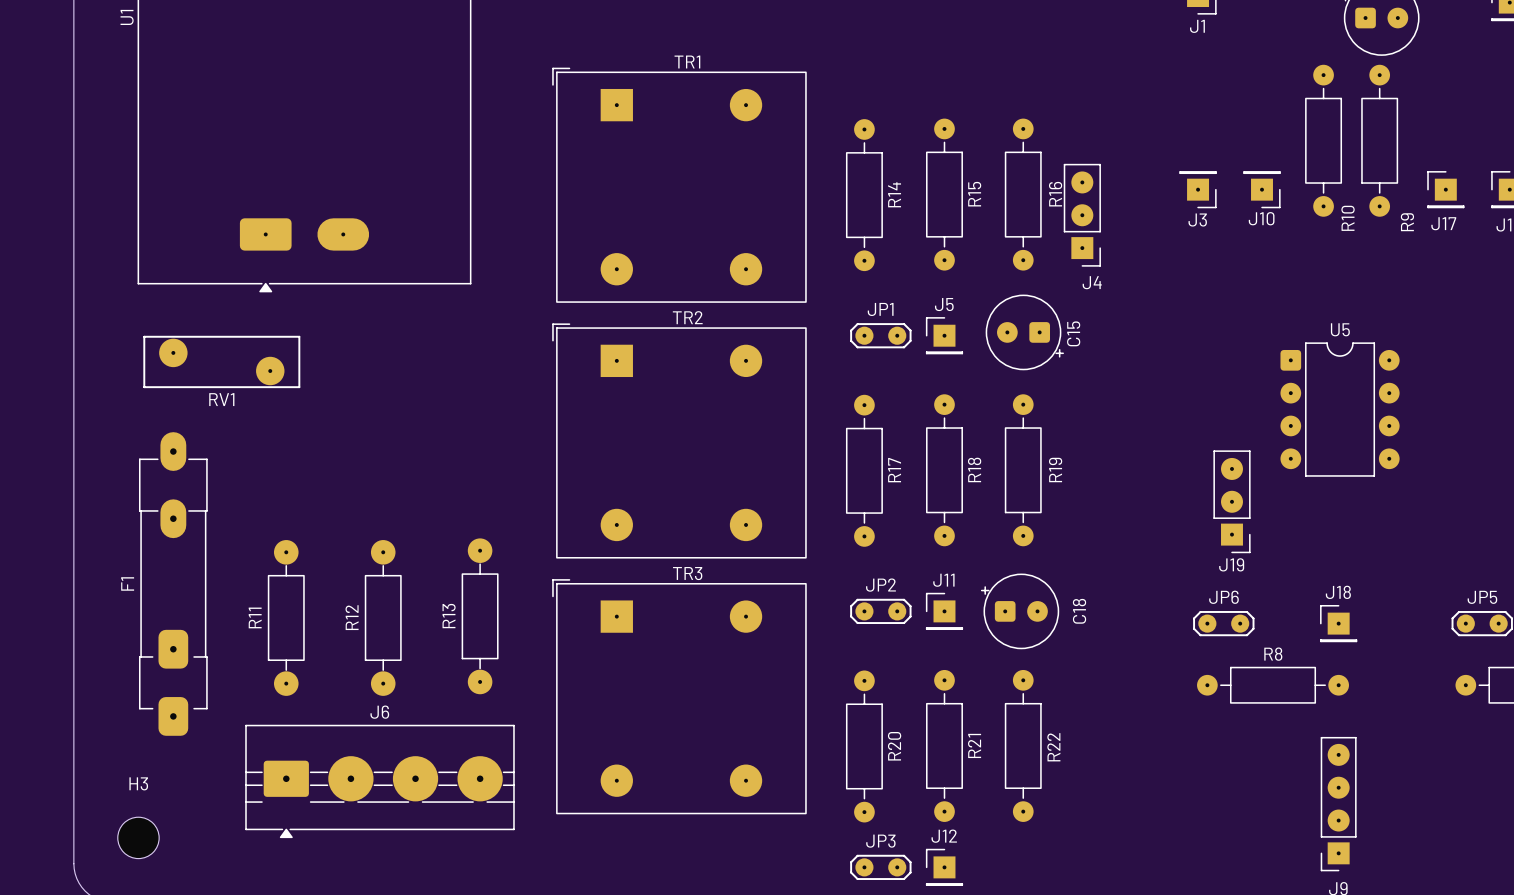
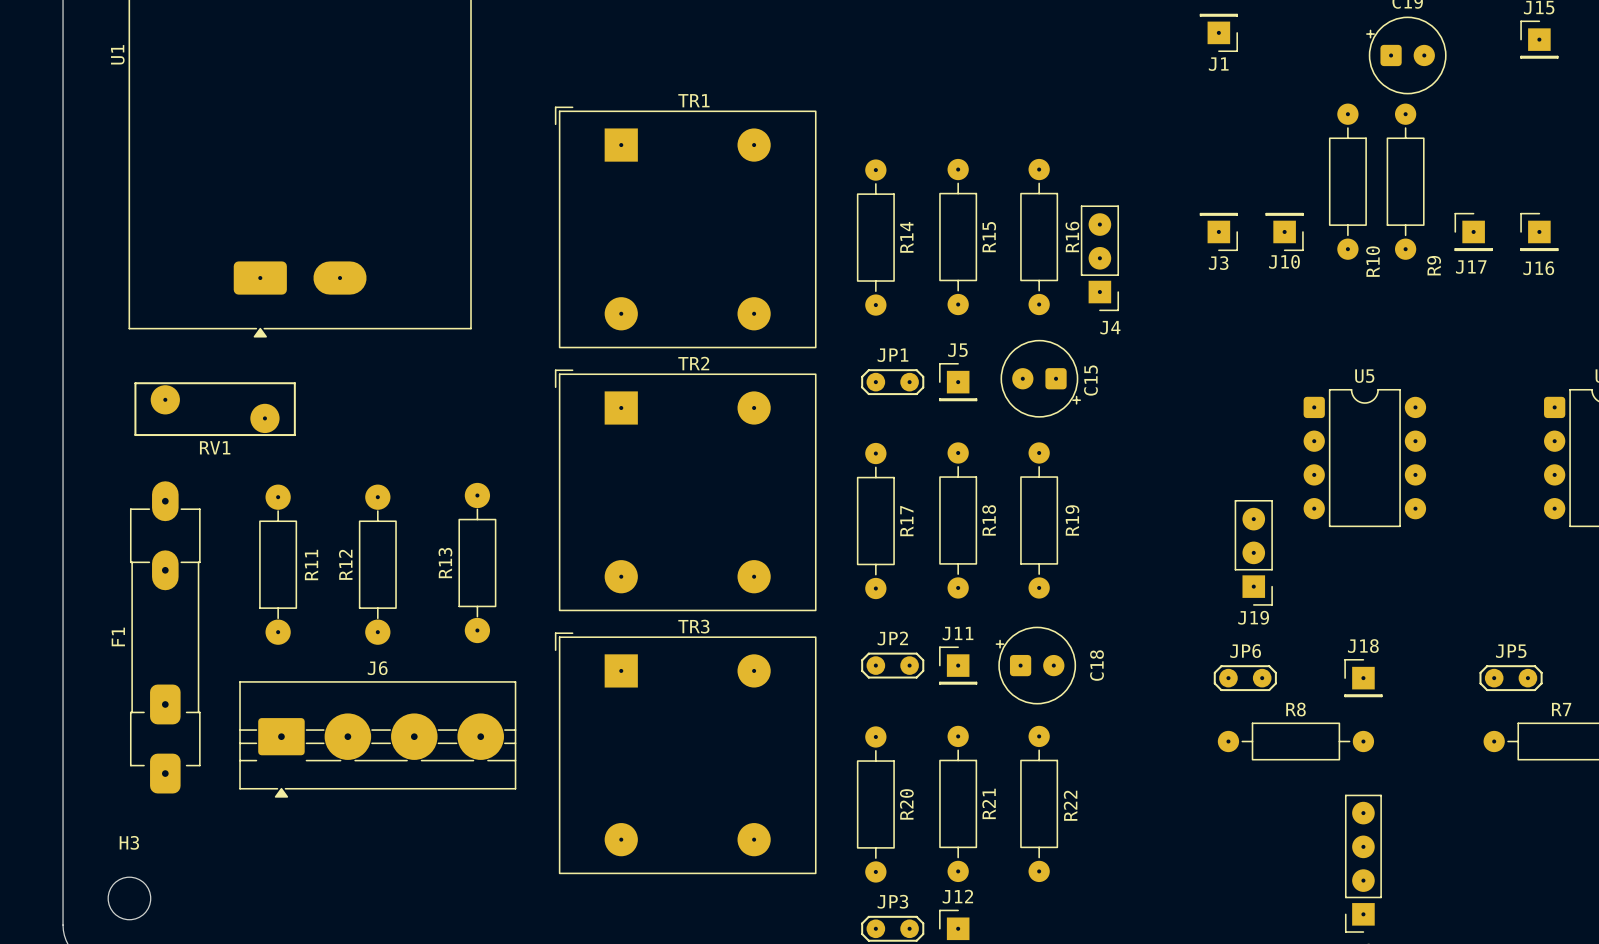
R13 position: (480, 616) -> (477, 562)
R11 name position: R11 (255, 617) -> R11 (311, 565)
R11 position: (286, 617) -> (278, 564)
R12 position: (383, 617) -> (377, 564)
J6 position: (379, 781) -> (377, 739)

